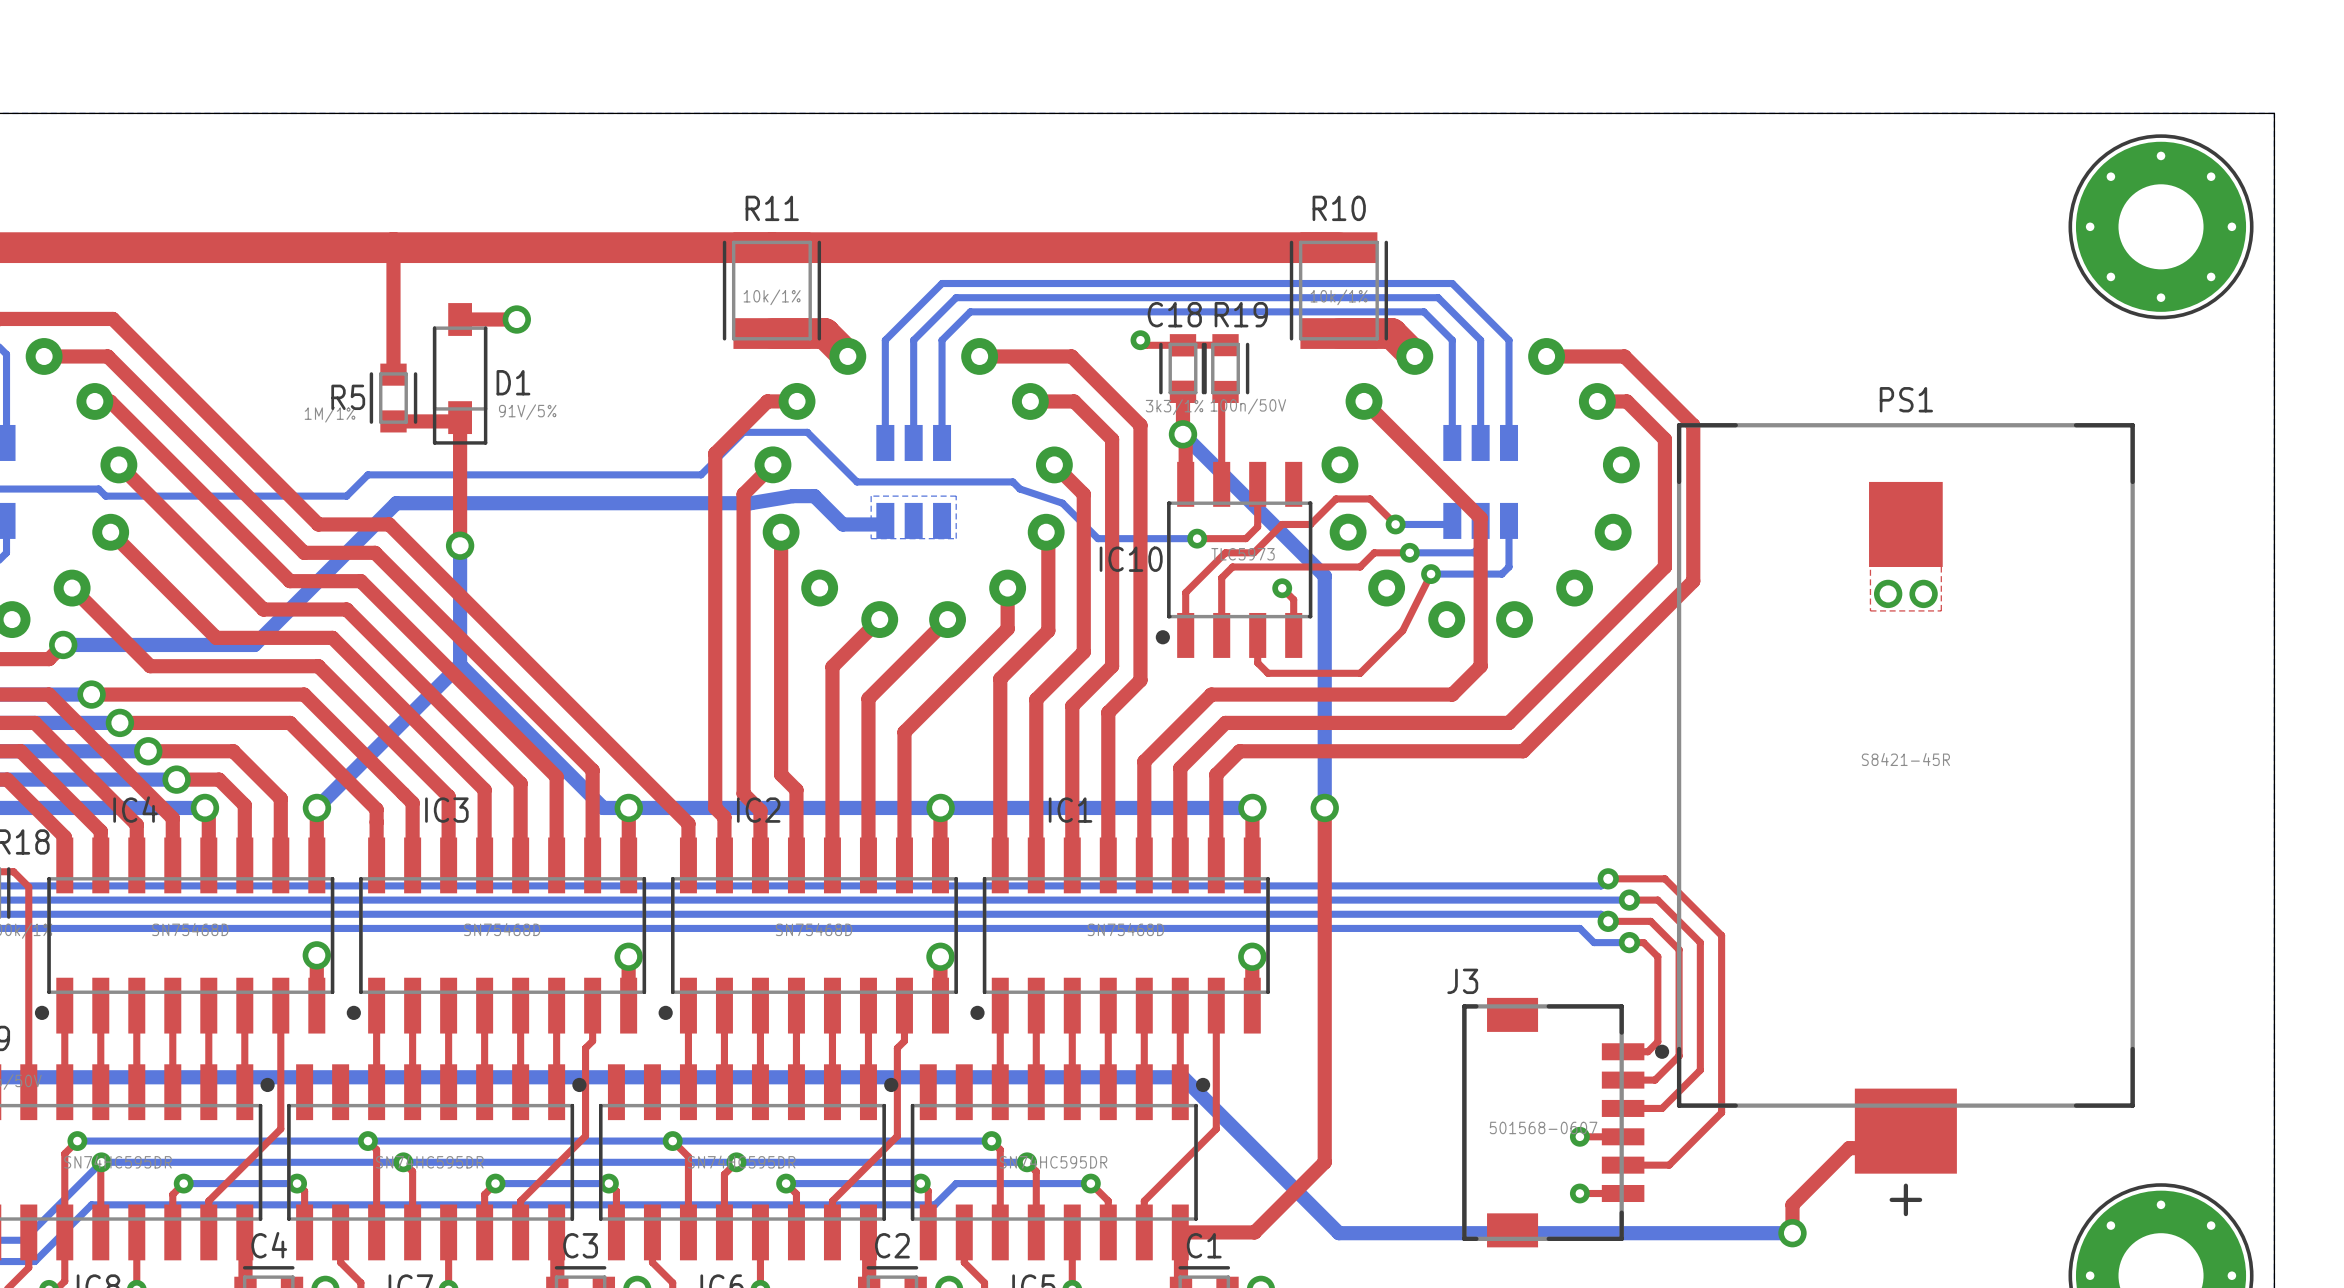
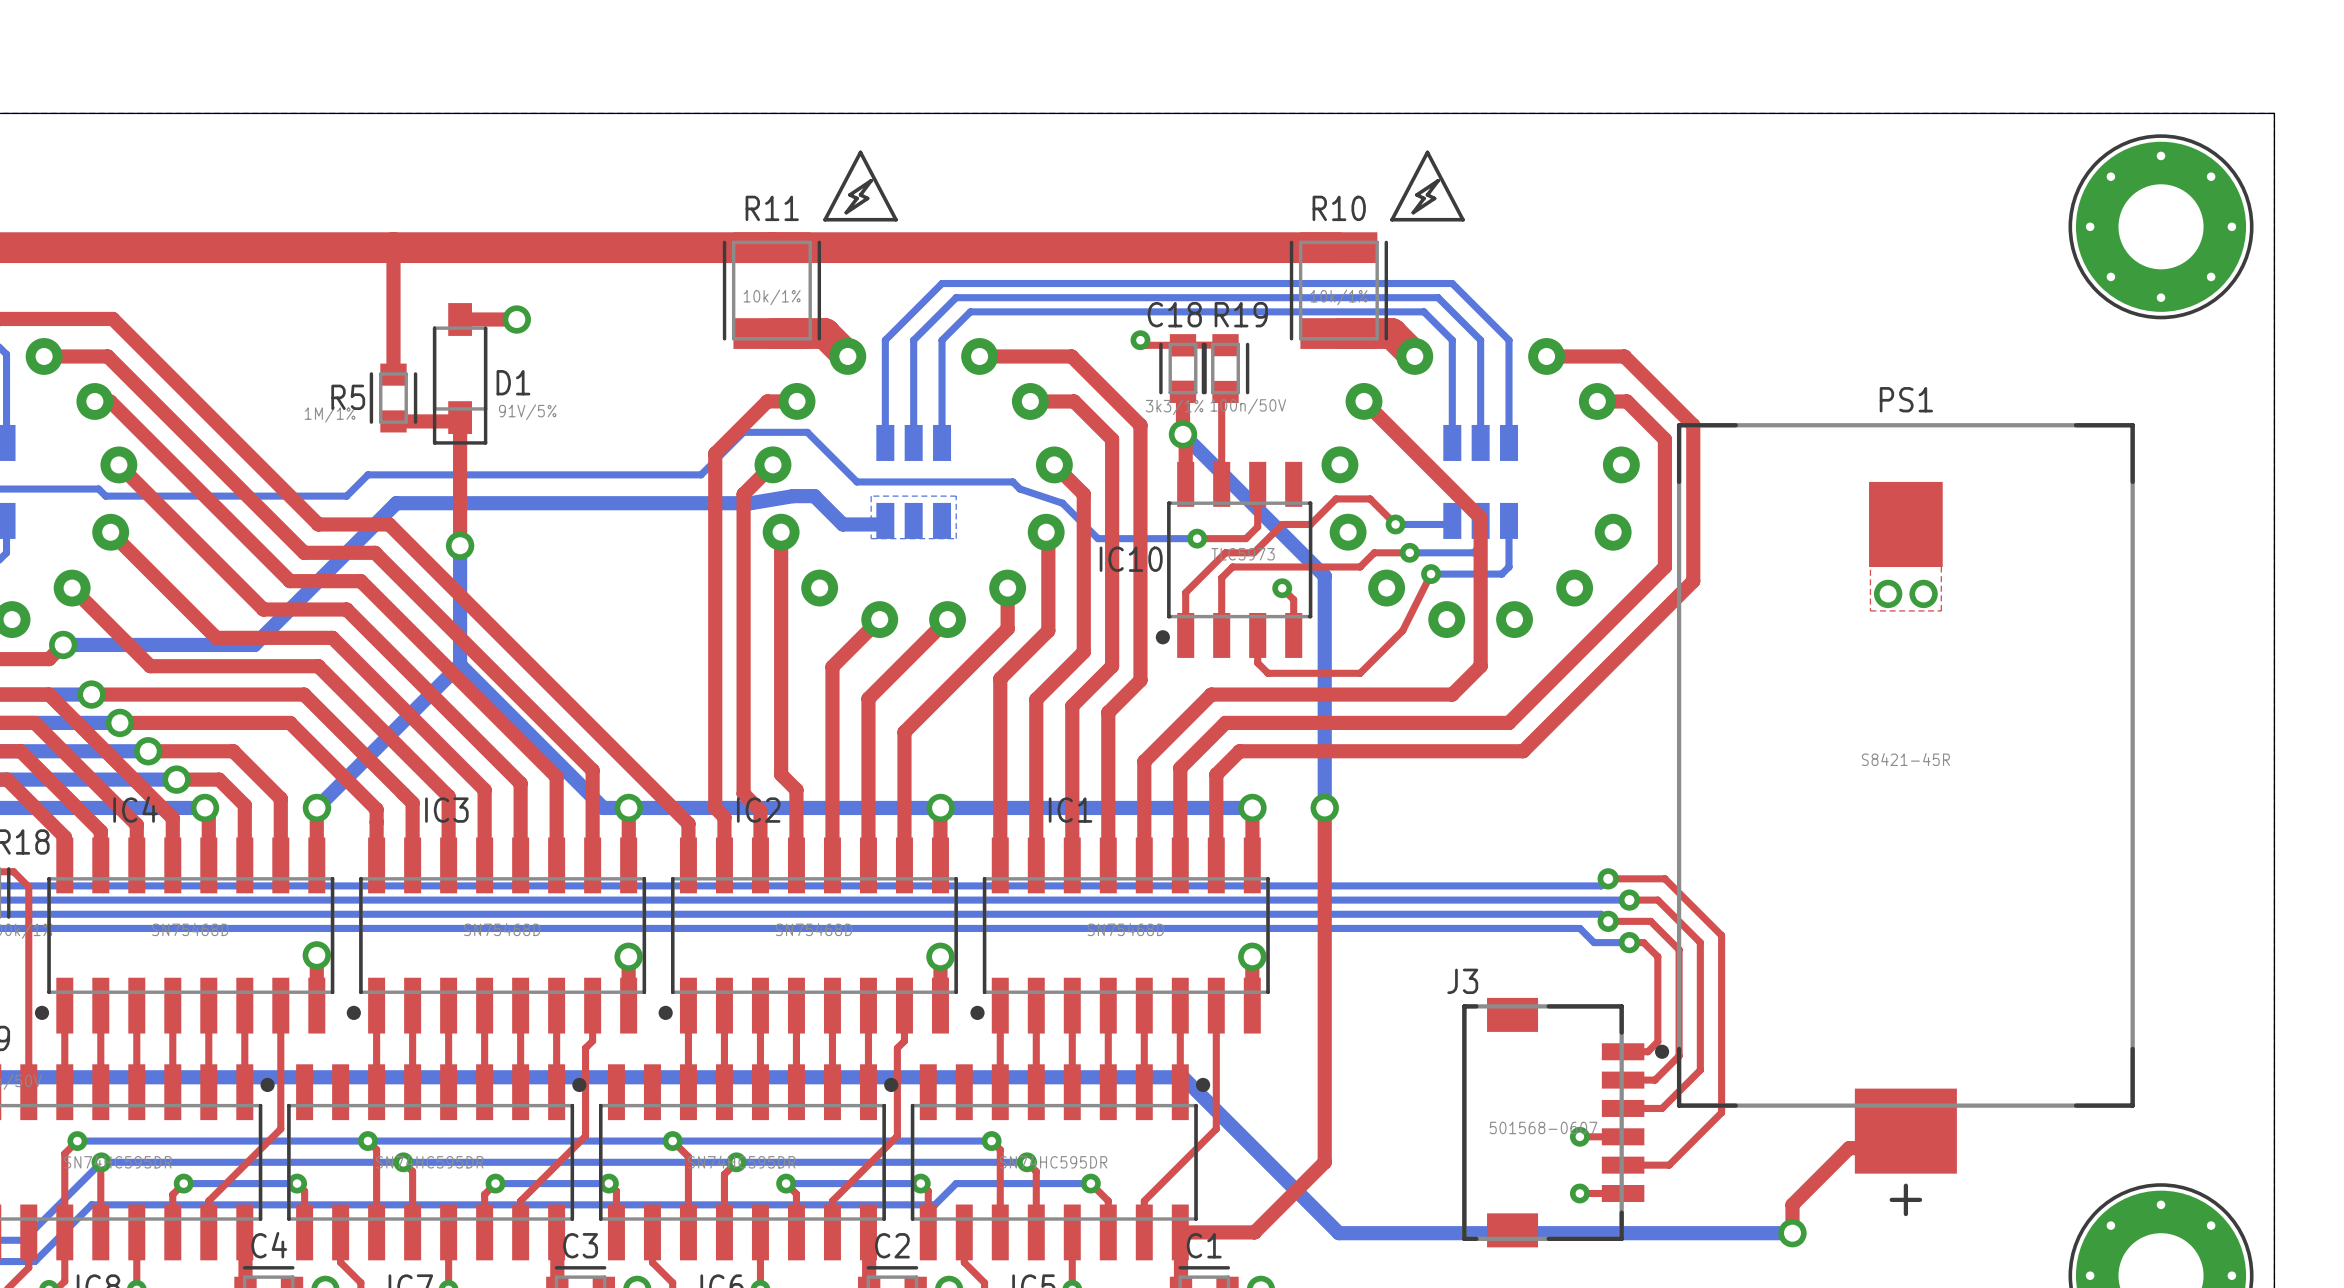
line: none -> (860, 152) (895, 219) (825, 219) (860, 152)
line: none -> (1427, 152) (1462, 219) (1392, 219) (1427, 152)
line: none -> (871, 180) (849, 194) (856, 198) (846, 212) (867, 198) (860, 194) (871, 180)
line: none -> (1438, 180) (1416, 194) (1423, 198) (1413, 212) (1434, 198) (1427, 194) (1438, 180)

